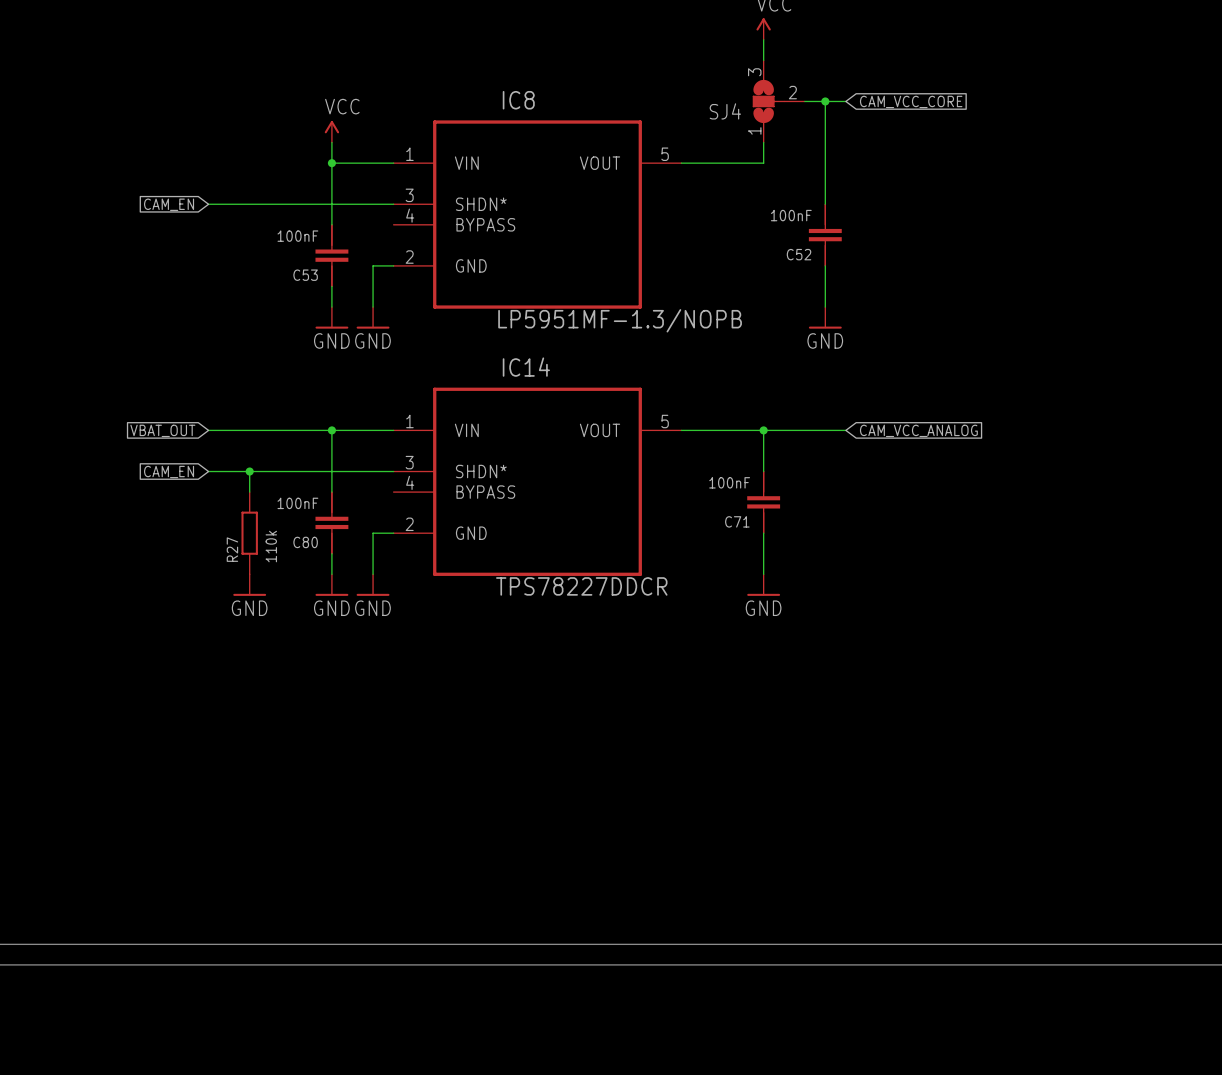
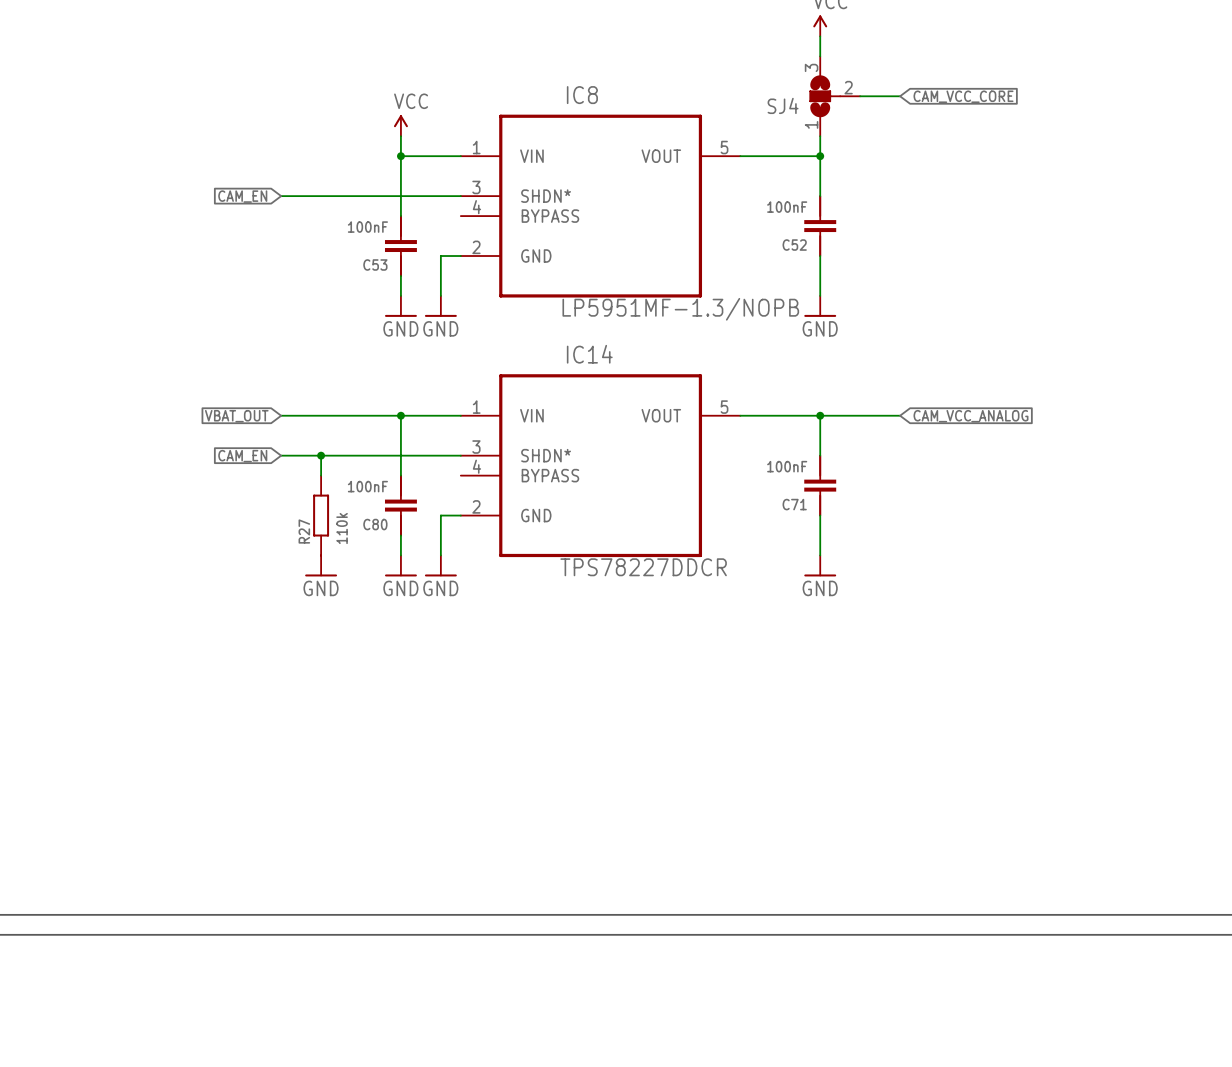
wire: (825, 101) (825, 204) -> none
junction: (825, 101) -> none
wire: none -> (820, 156) (820, 196)
junction: none -> (820, 156)
C52 position: (825, 235) -> (820, 226)
wire: (825, 265) (825, 307) -> (820, 256) (820, 295)
power symbol position: GND (825, 317) -> GND (820, 306)

